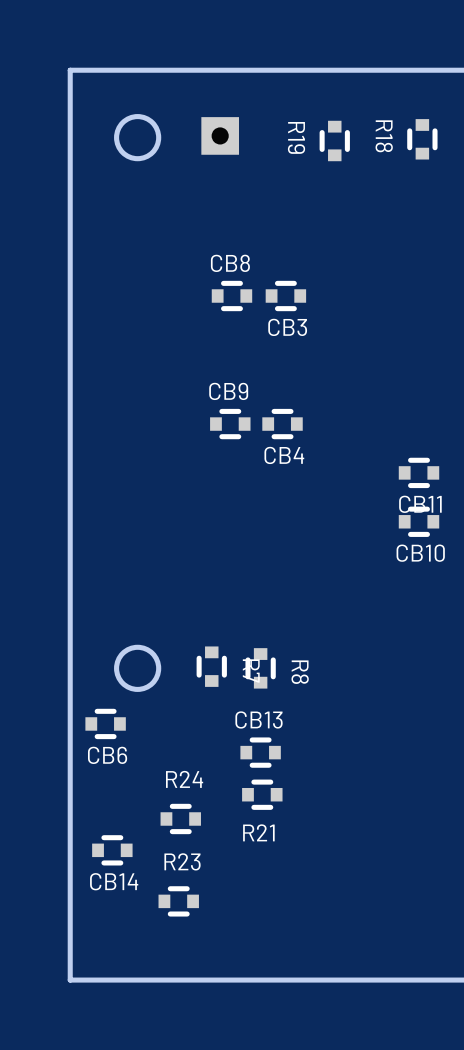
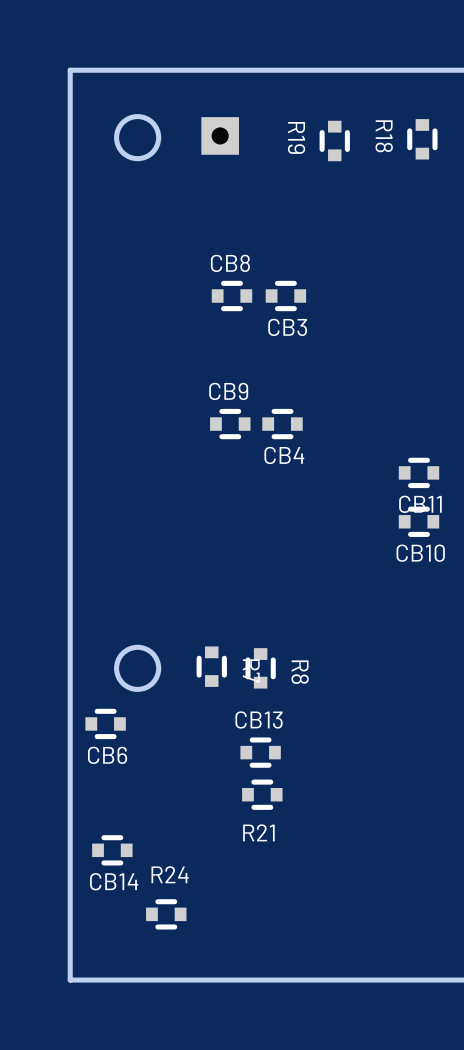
R24 position: (180, 818) -> (166, 914)
R23: (178, 901) -> none

